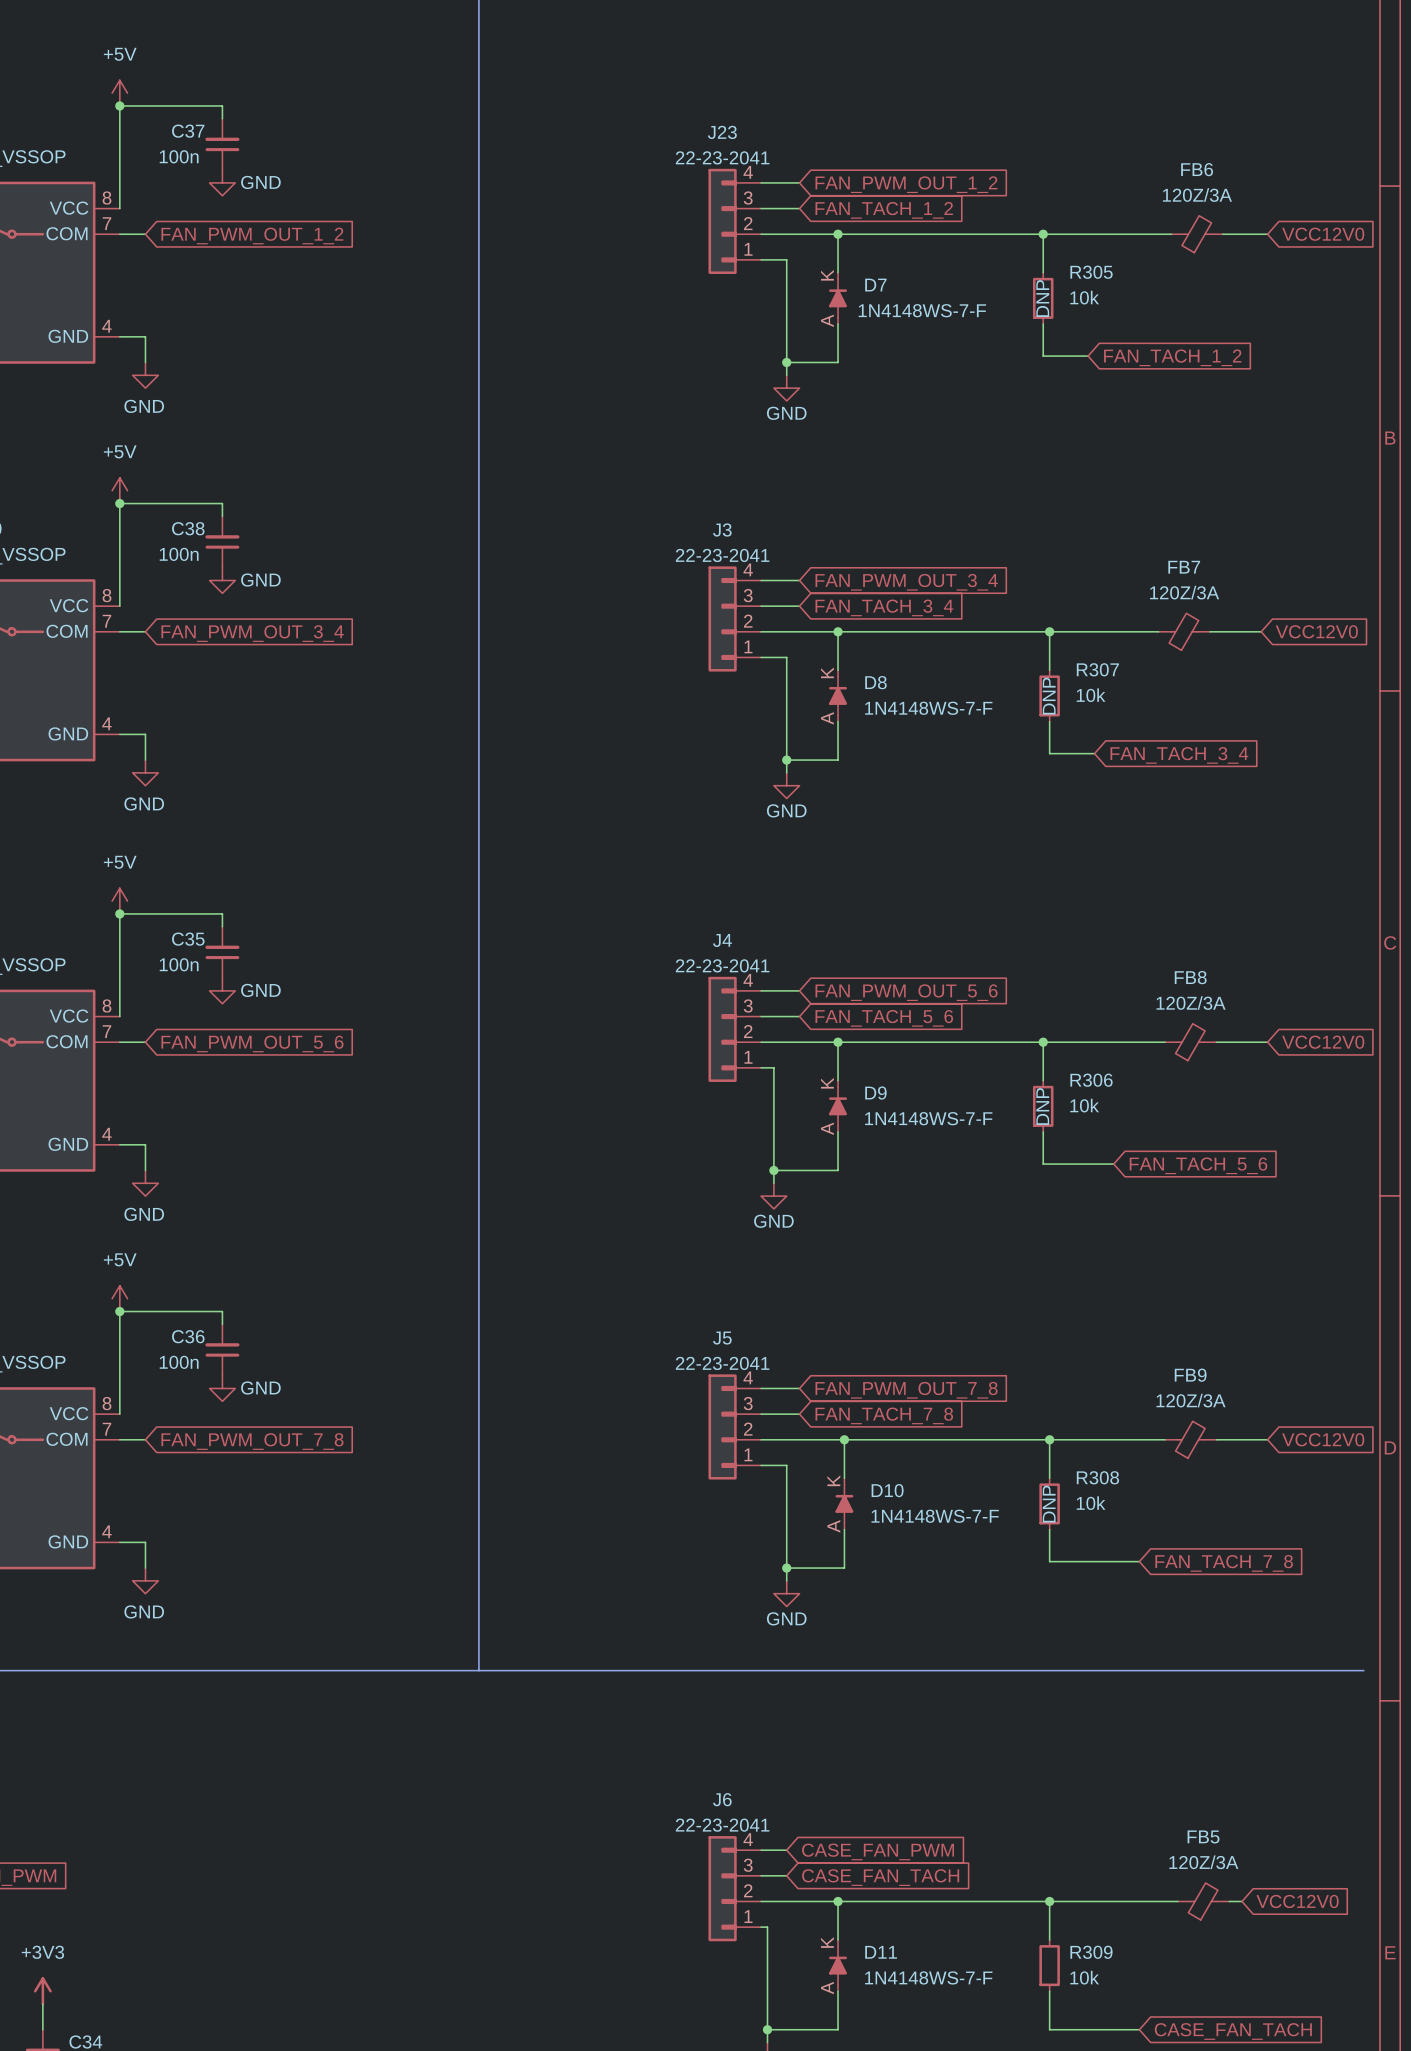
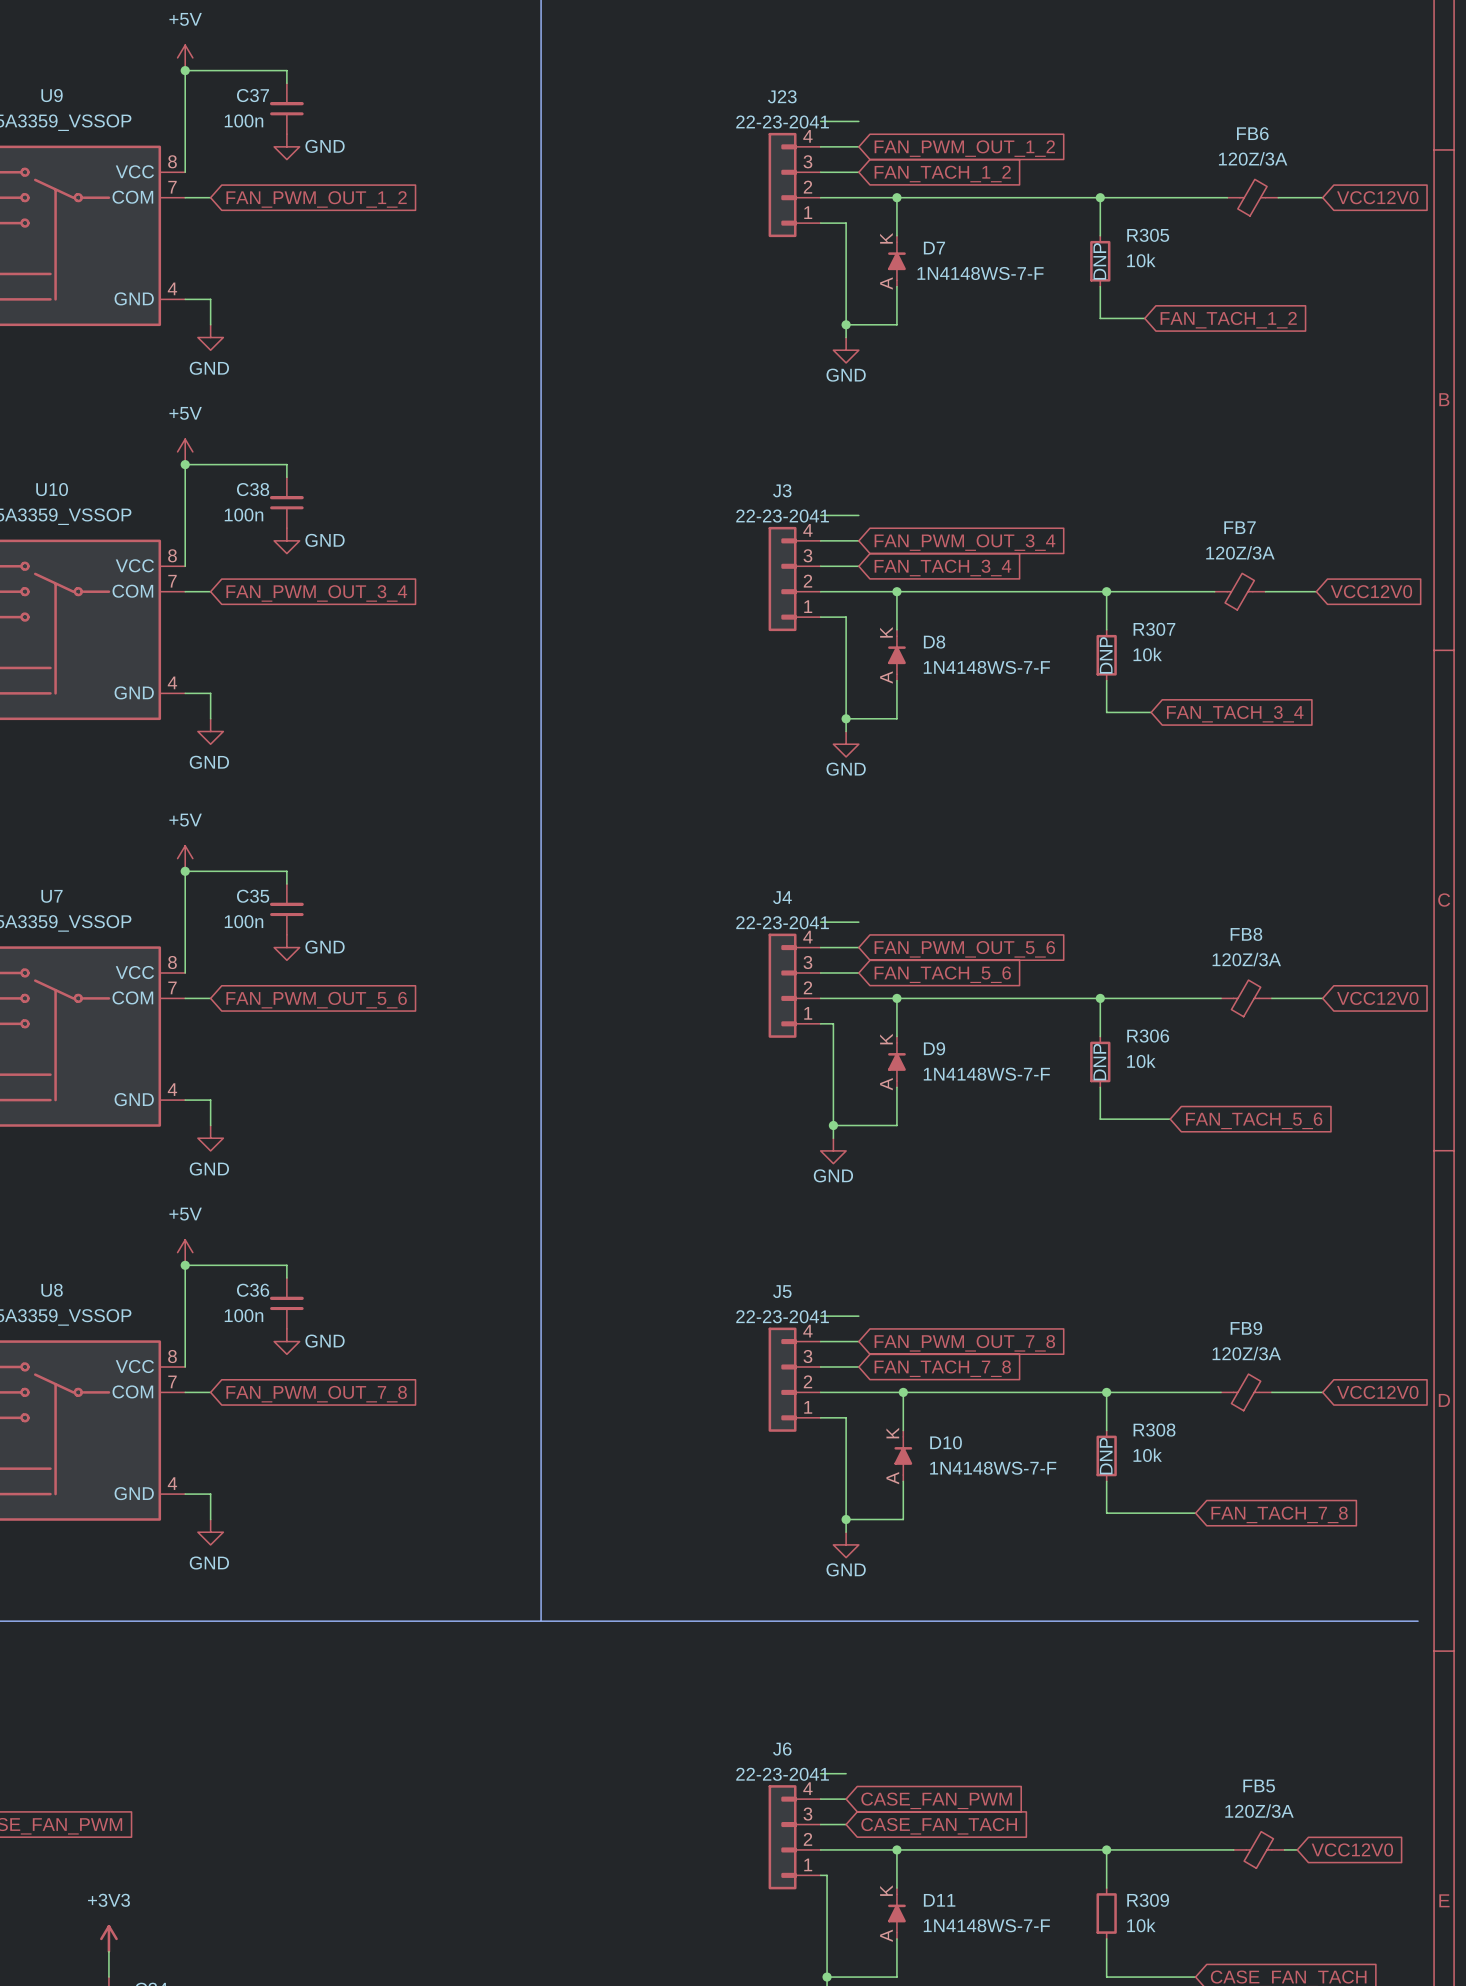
wire: none -> (820, 121) (858, 121)
wire: none -> (820, 515) (858, 515)
wire: none -> (820, 922) (858, 922)
wire: none -> (820, 1316) (858, 1316)
wire: none -> (820, 1773) (846, 1773)

